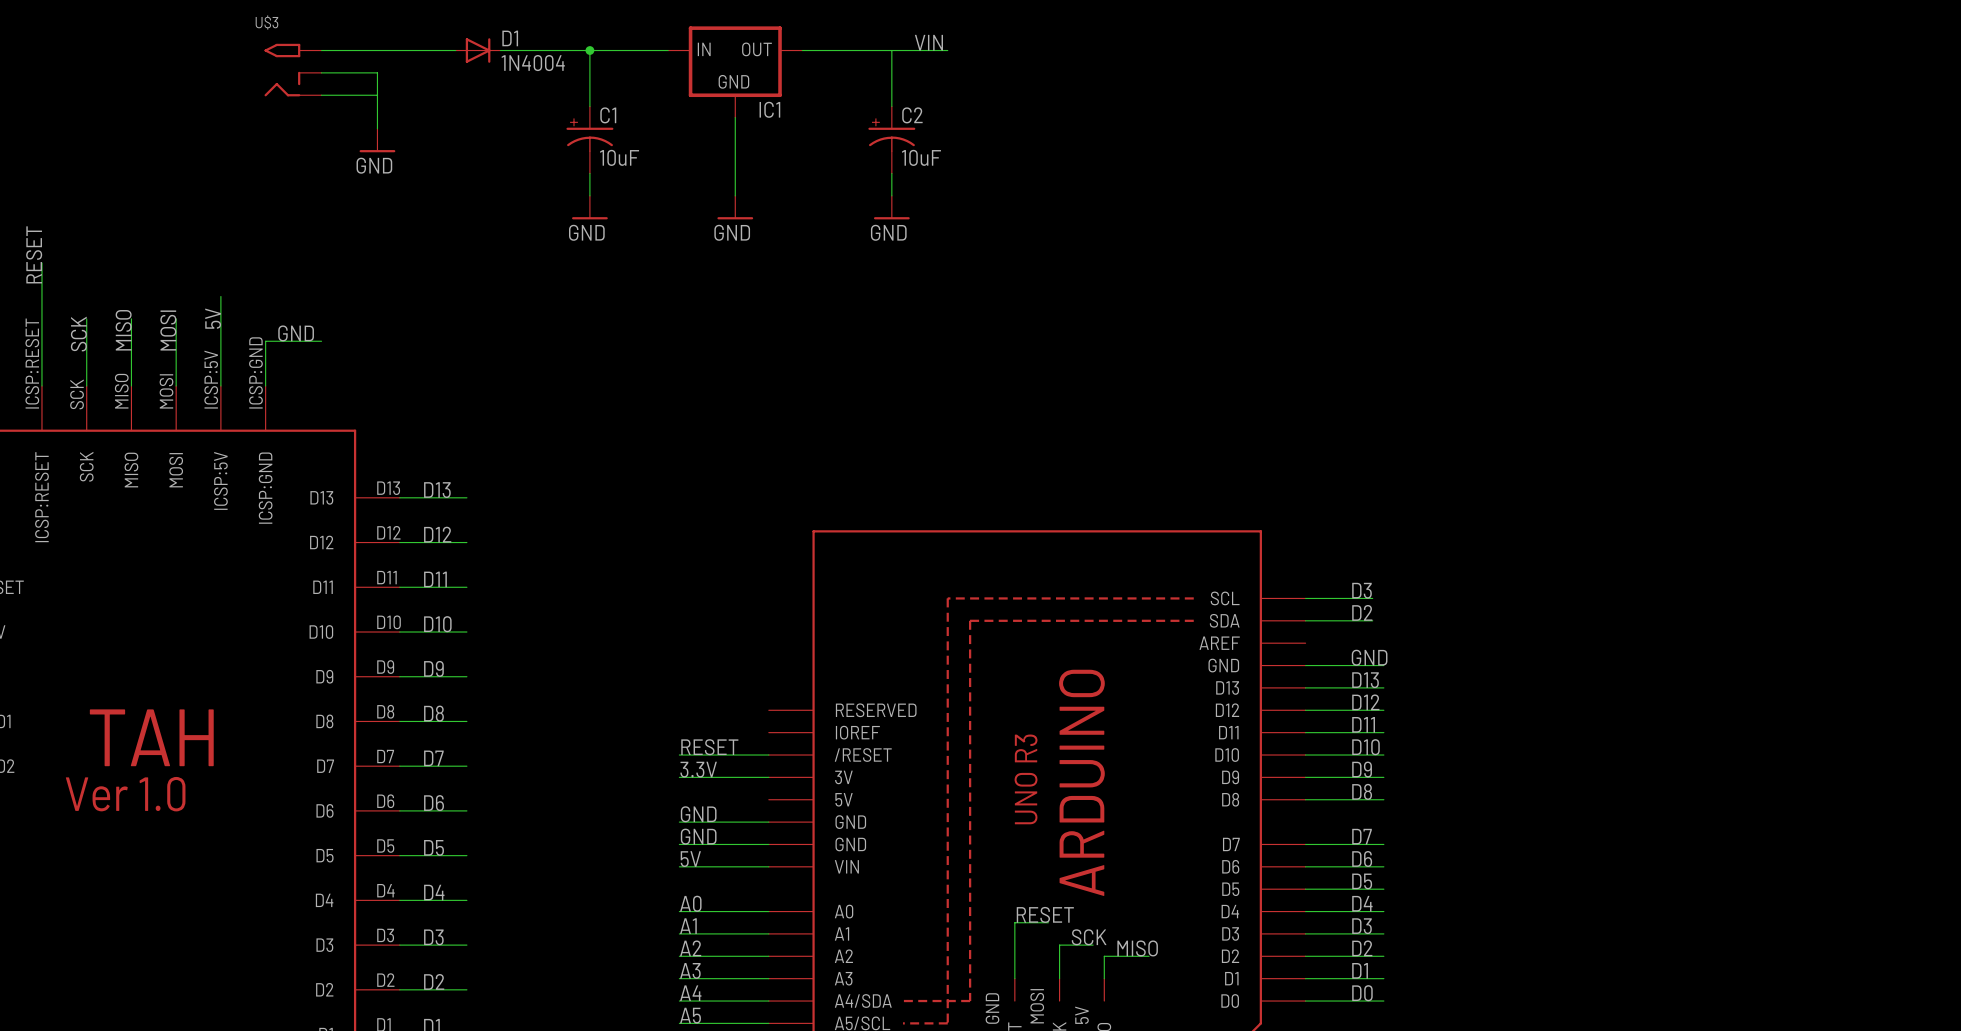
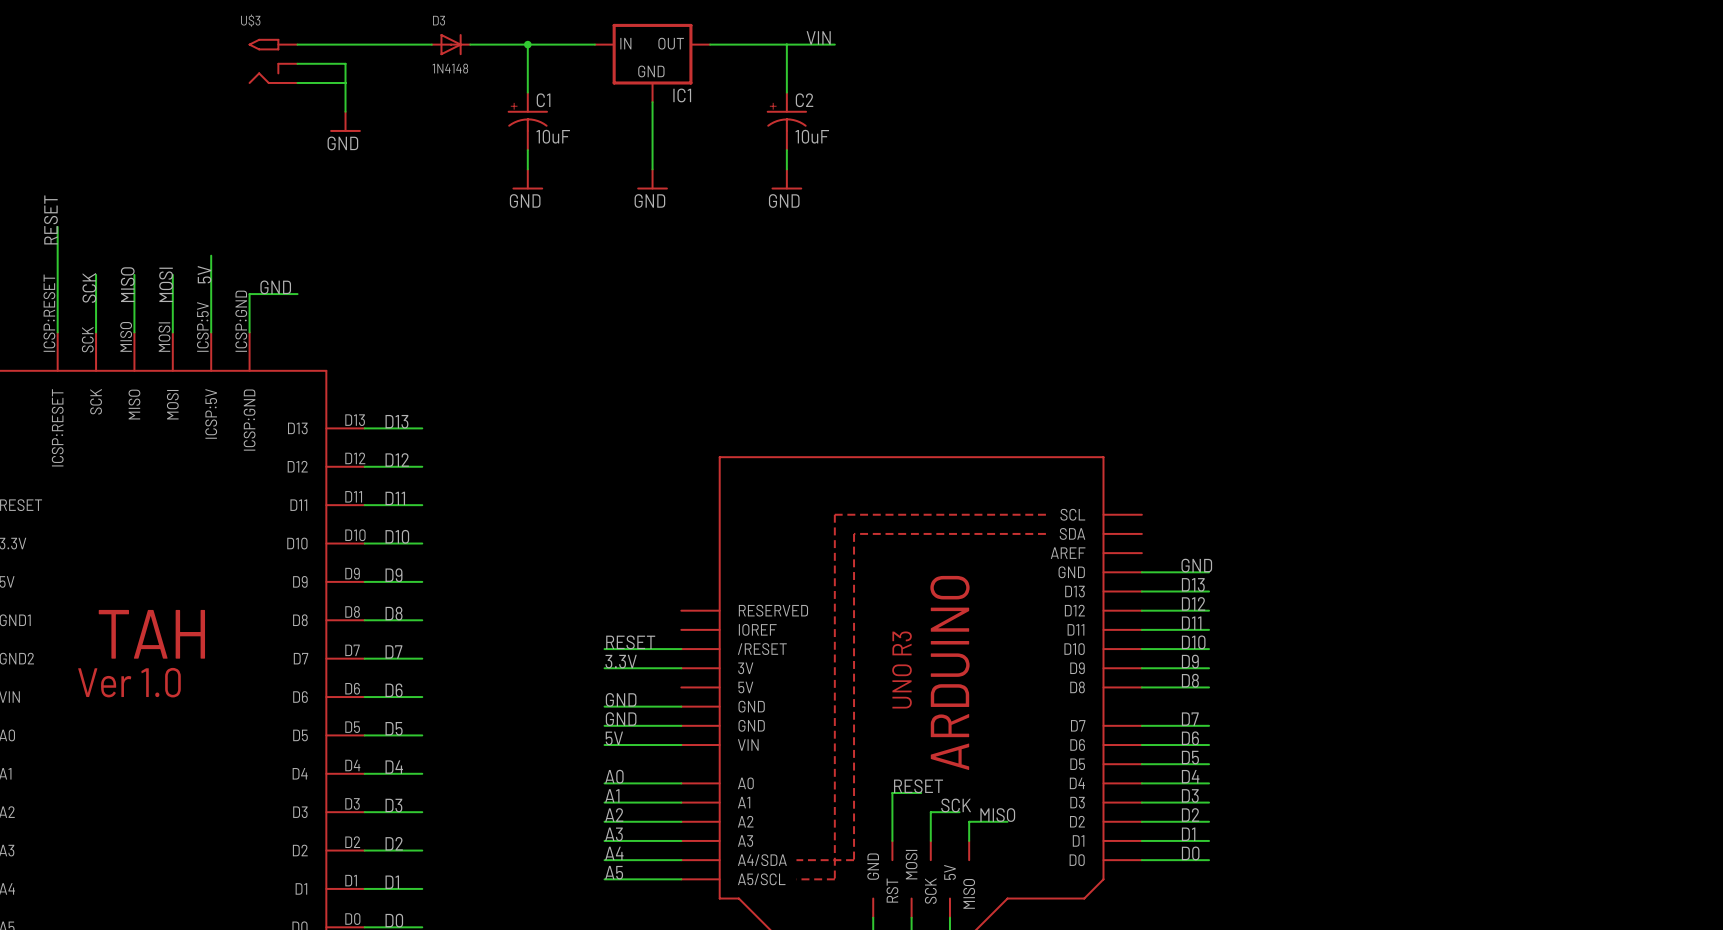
D1: 1N4004 (478, 50) -> none
D3: none -> 1N4148 (451, 44)
label: D3 (1362, 590) -> none
wire: (1305, 598) (1372, 598) -> none
label: D2 (1362, 612) -> none
wire: (1305, 620) (1372, 620) -> none

